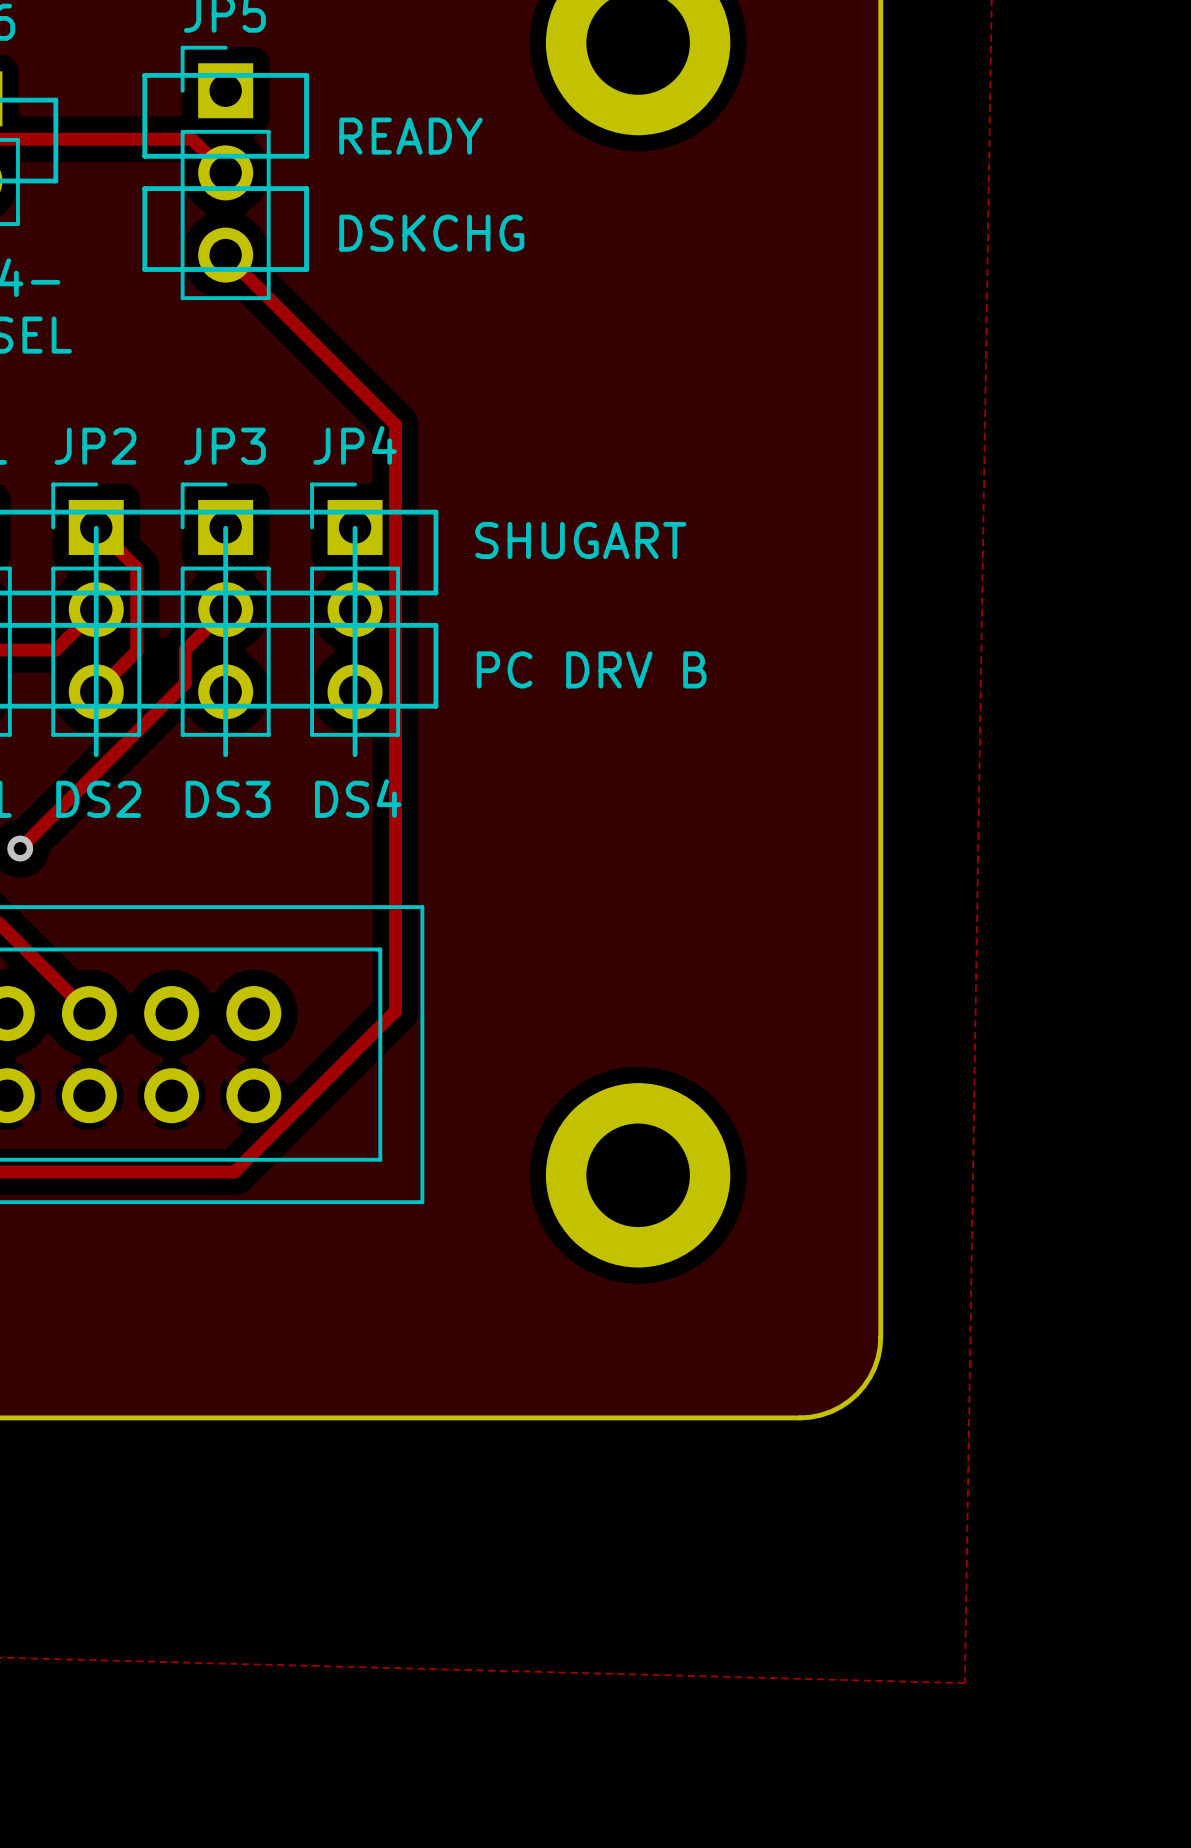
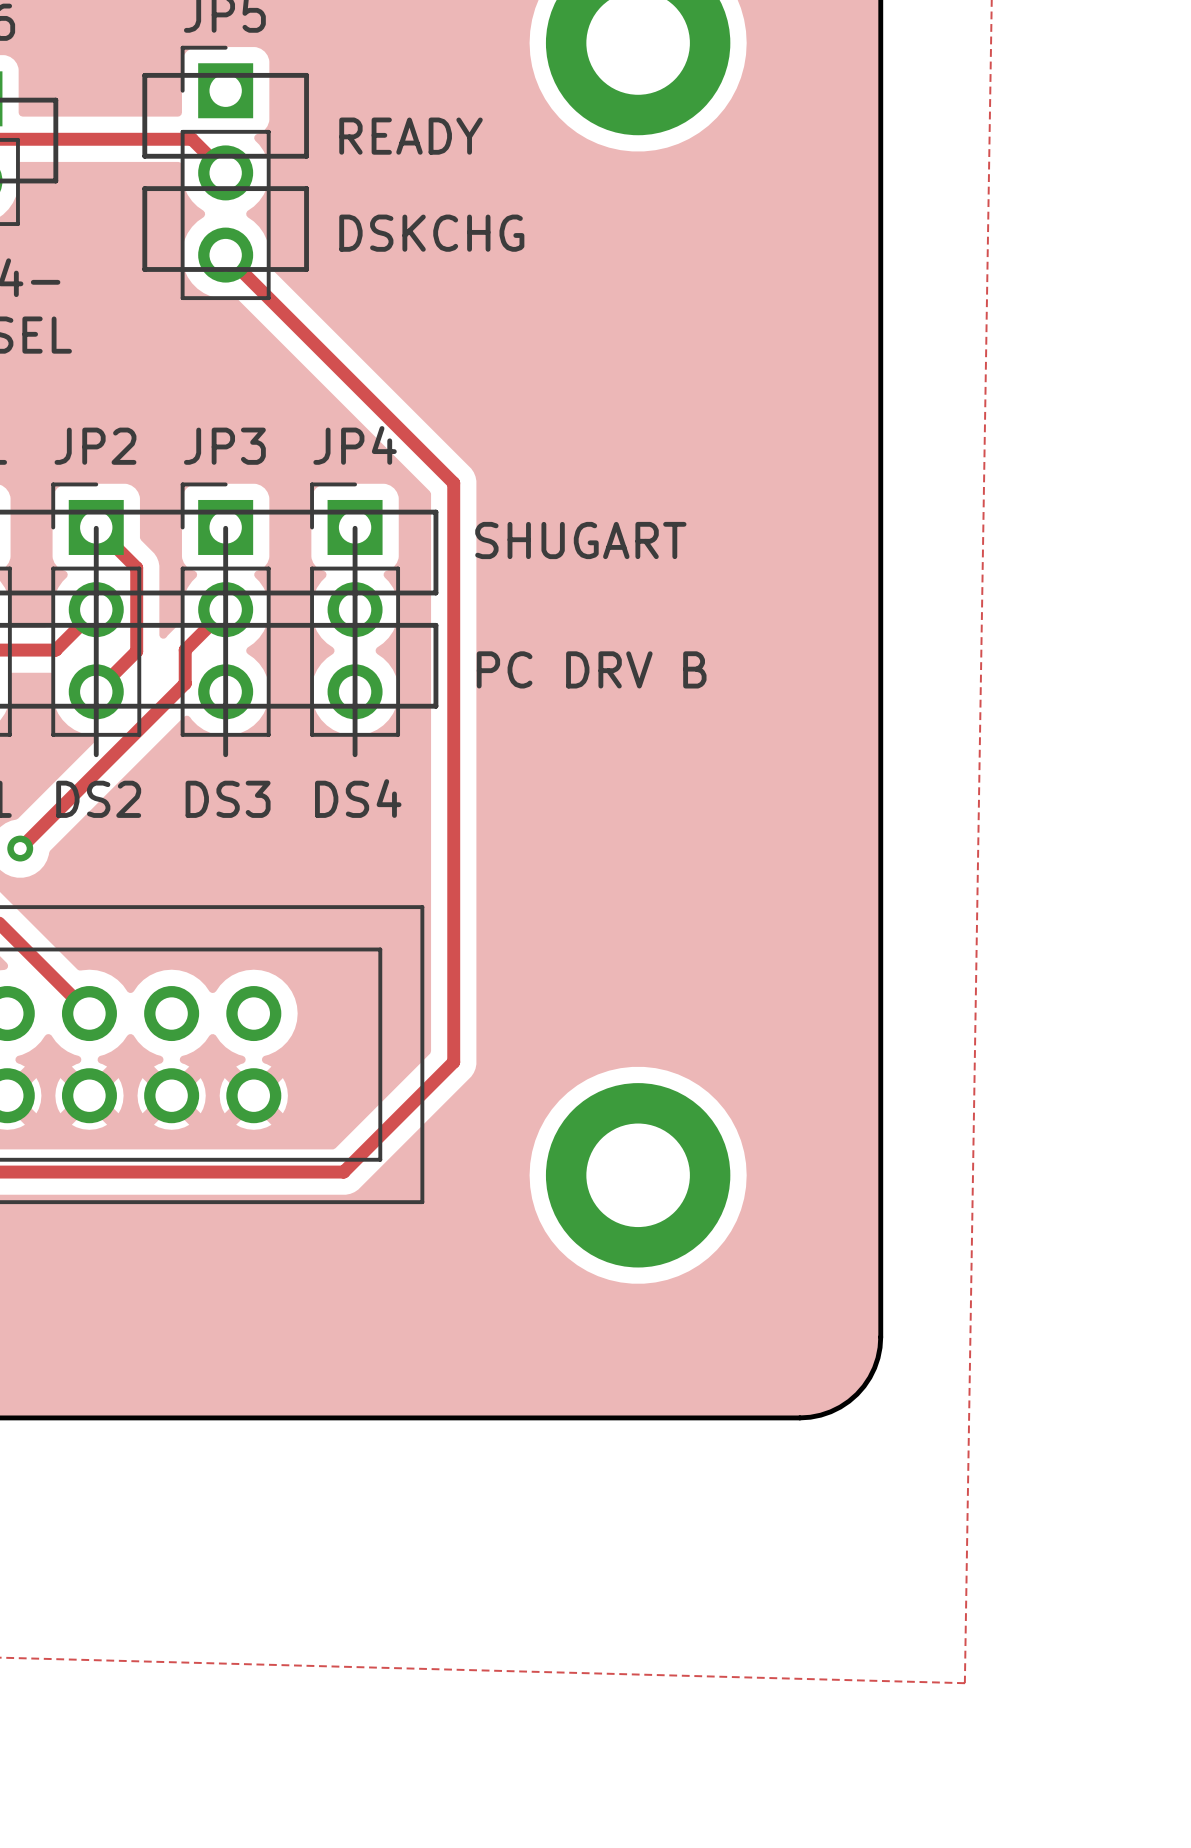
track: (395, 424) (395, 1011) (234, 1172) -> (395, 424) (453, 483) (453, 1062) (343, 1172) (234, 1172)

